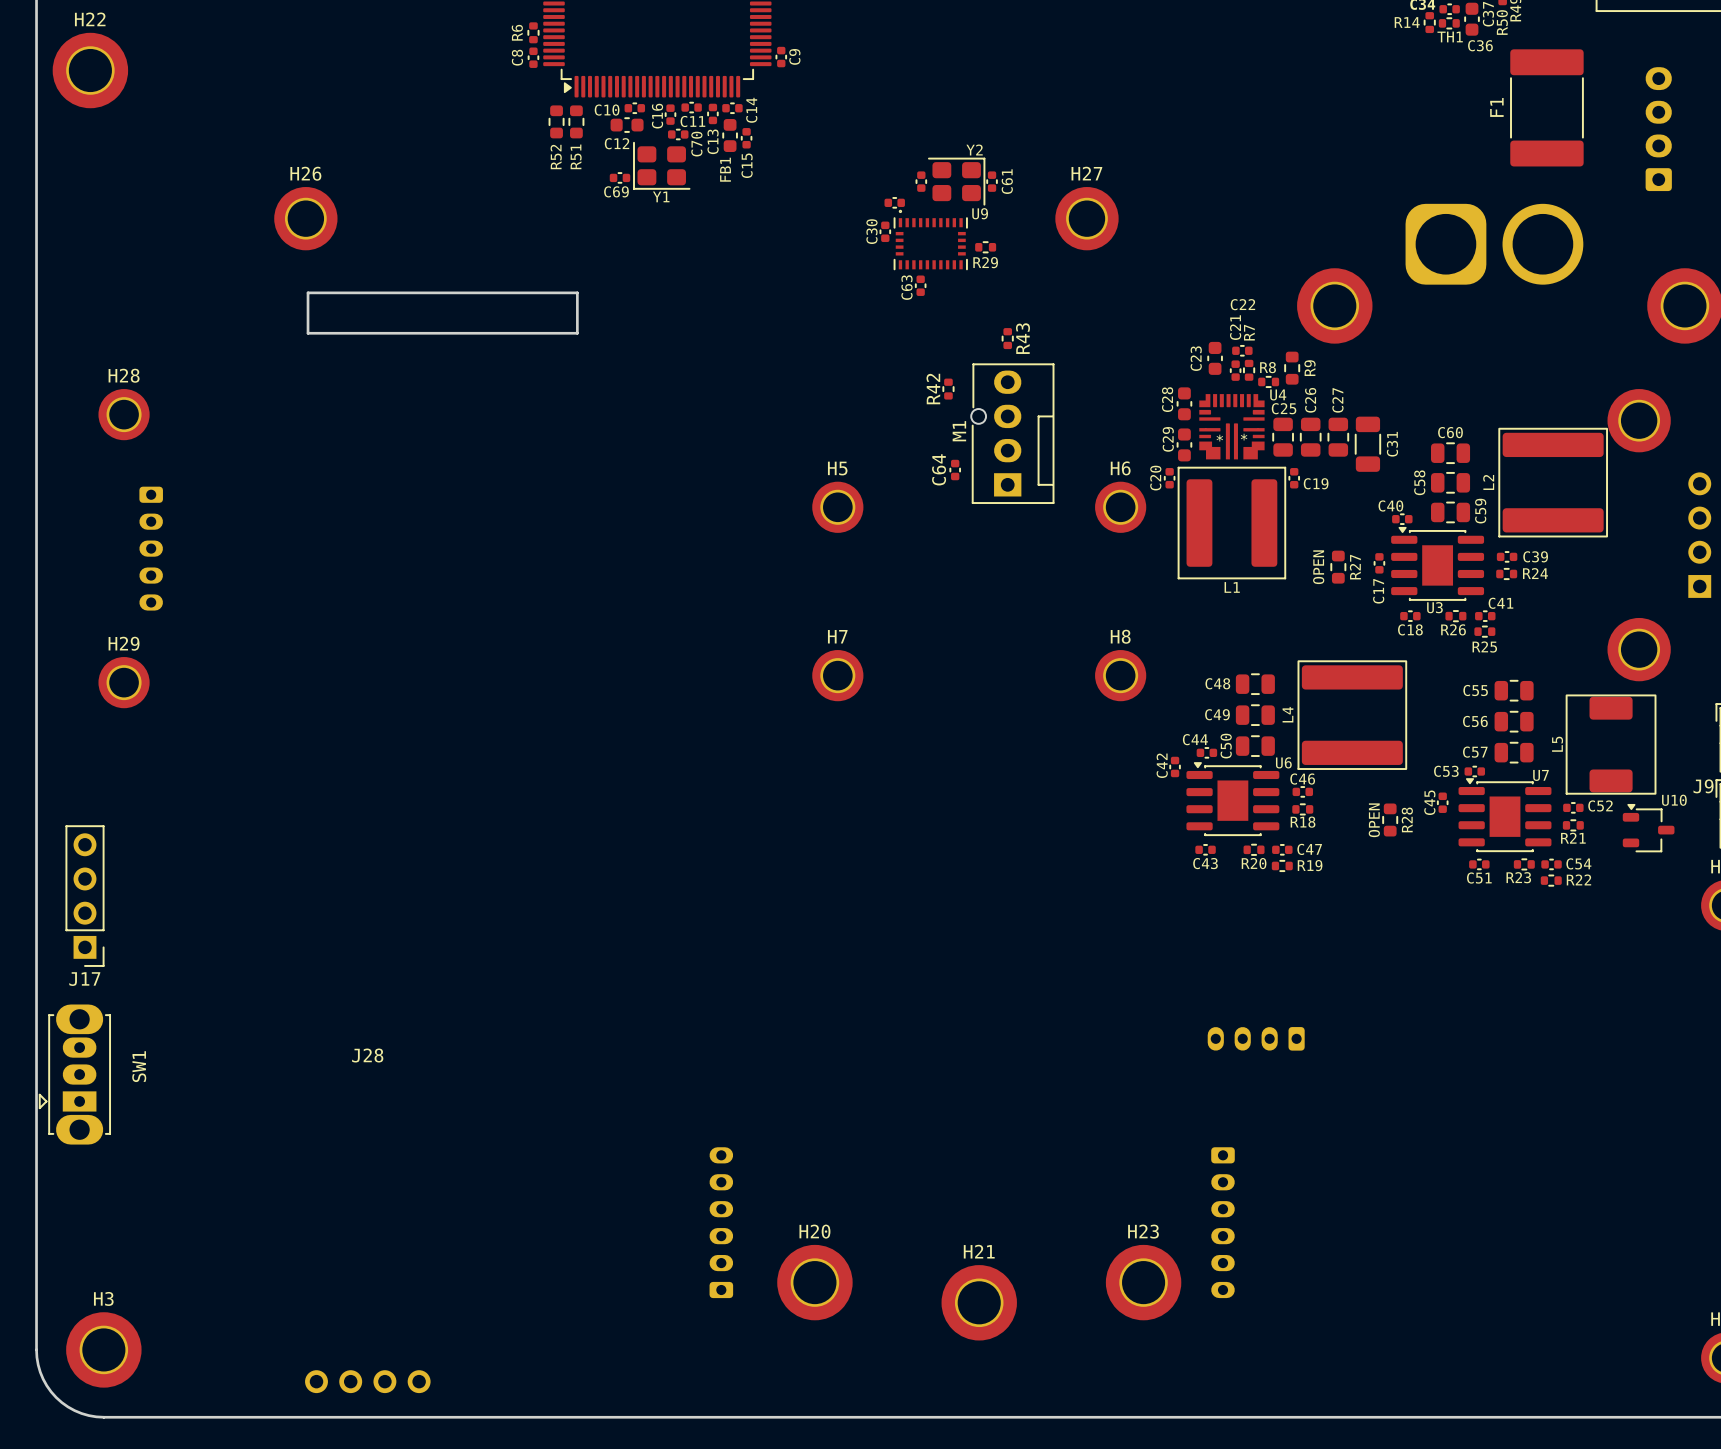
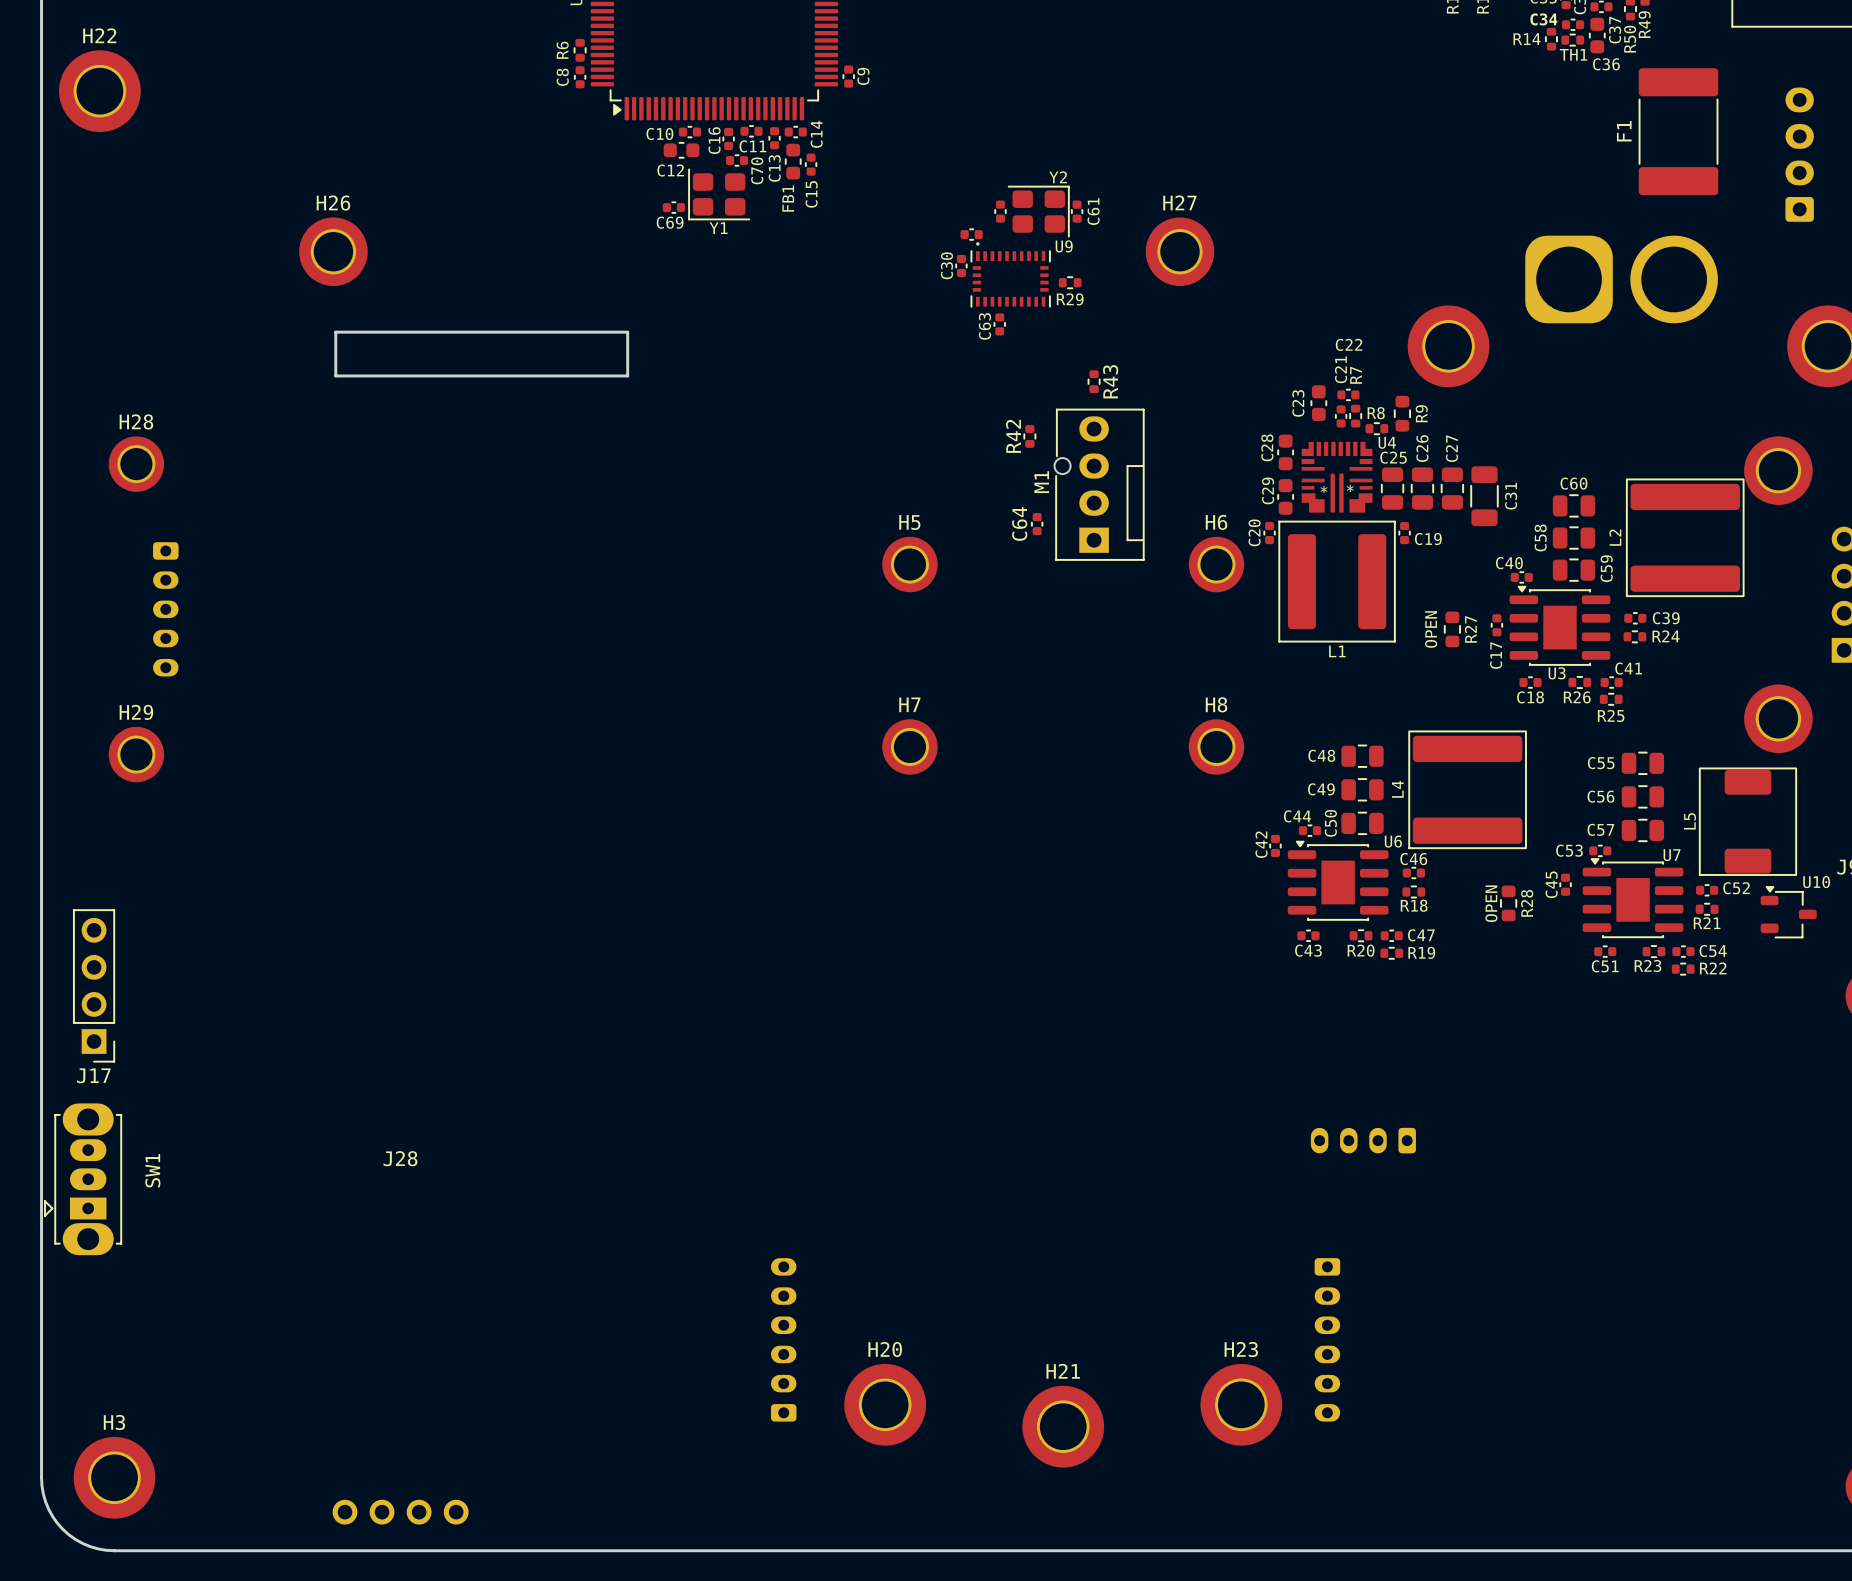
R52: (556, 121) -> none
R51: (576, 121) -> none

